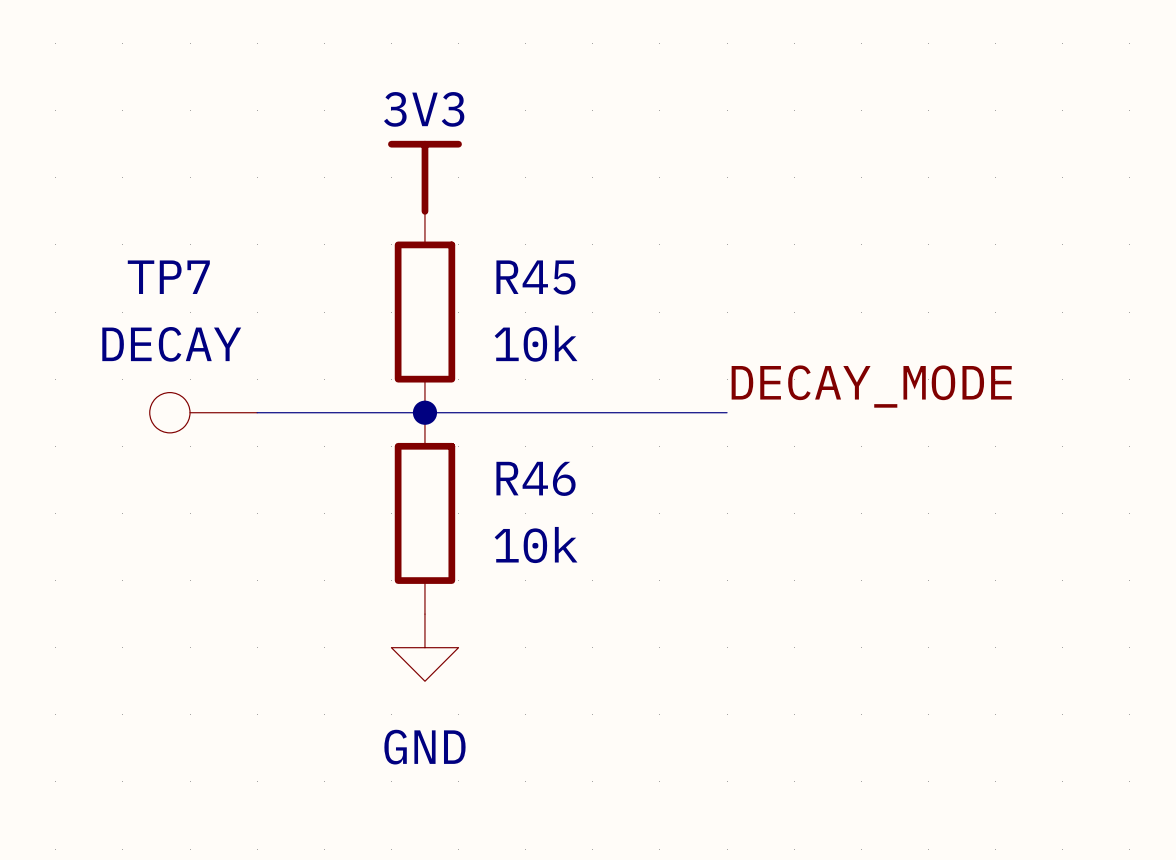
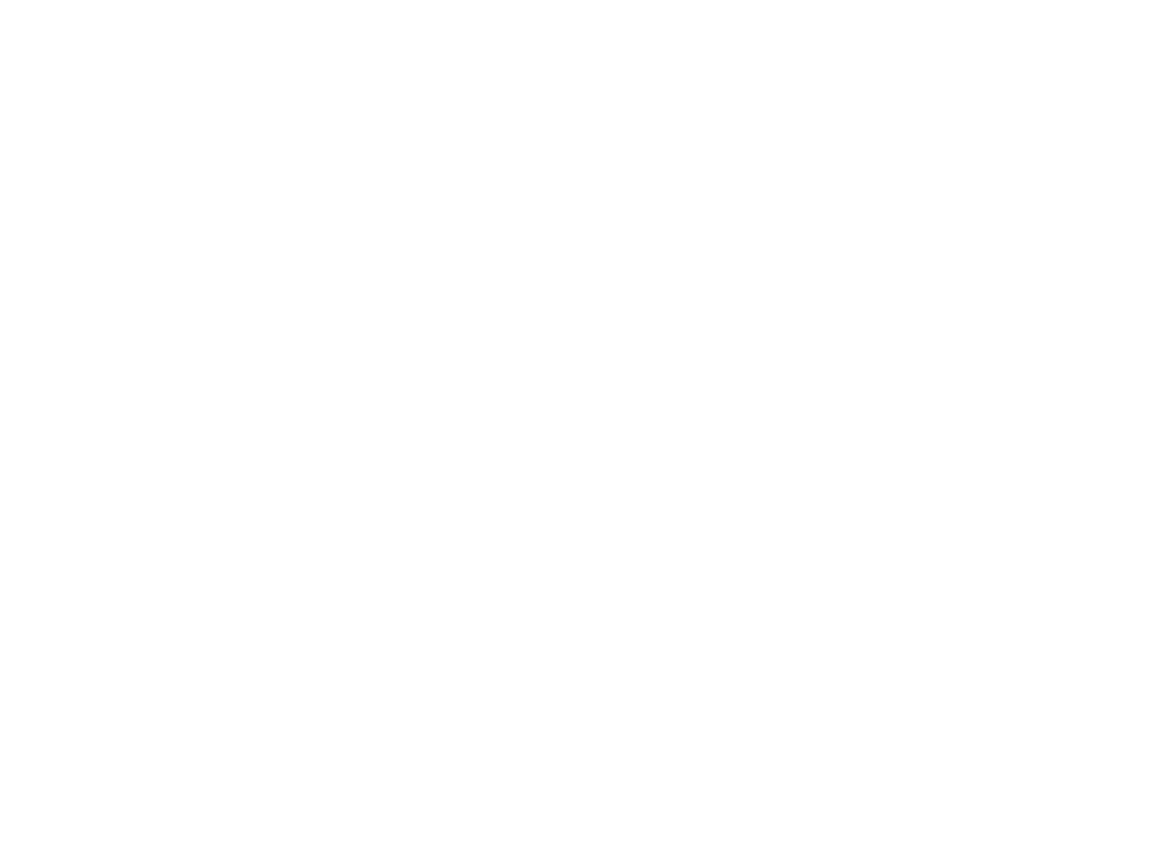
power symbol: 3V3 (424, 177) -> none
R45: 10k (424, 312) -> none
label: DECAY_MODE (871, 386) -> none
TP7: DECAY (203, 412) -> none
wire: (257, 412) (727, 412) -> none
junction: (424, 412) -> none
R46: 10k (424, 513) -> none
power symbol: GND (424, 647) -> none

